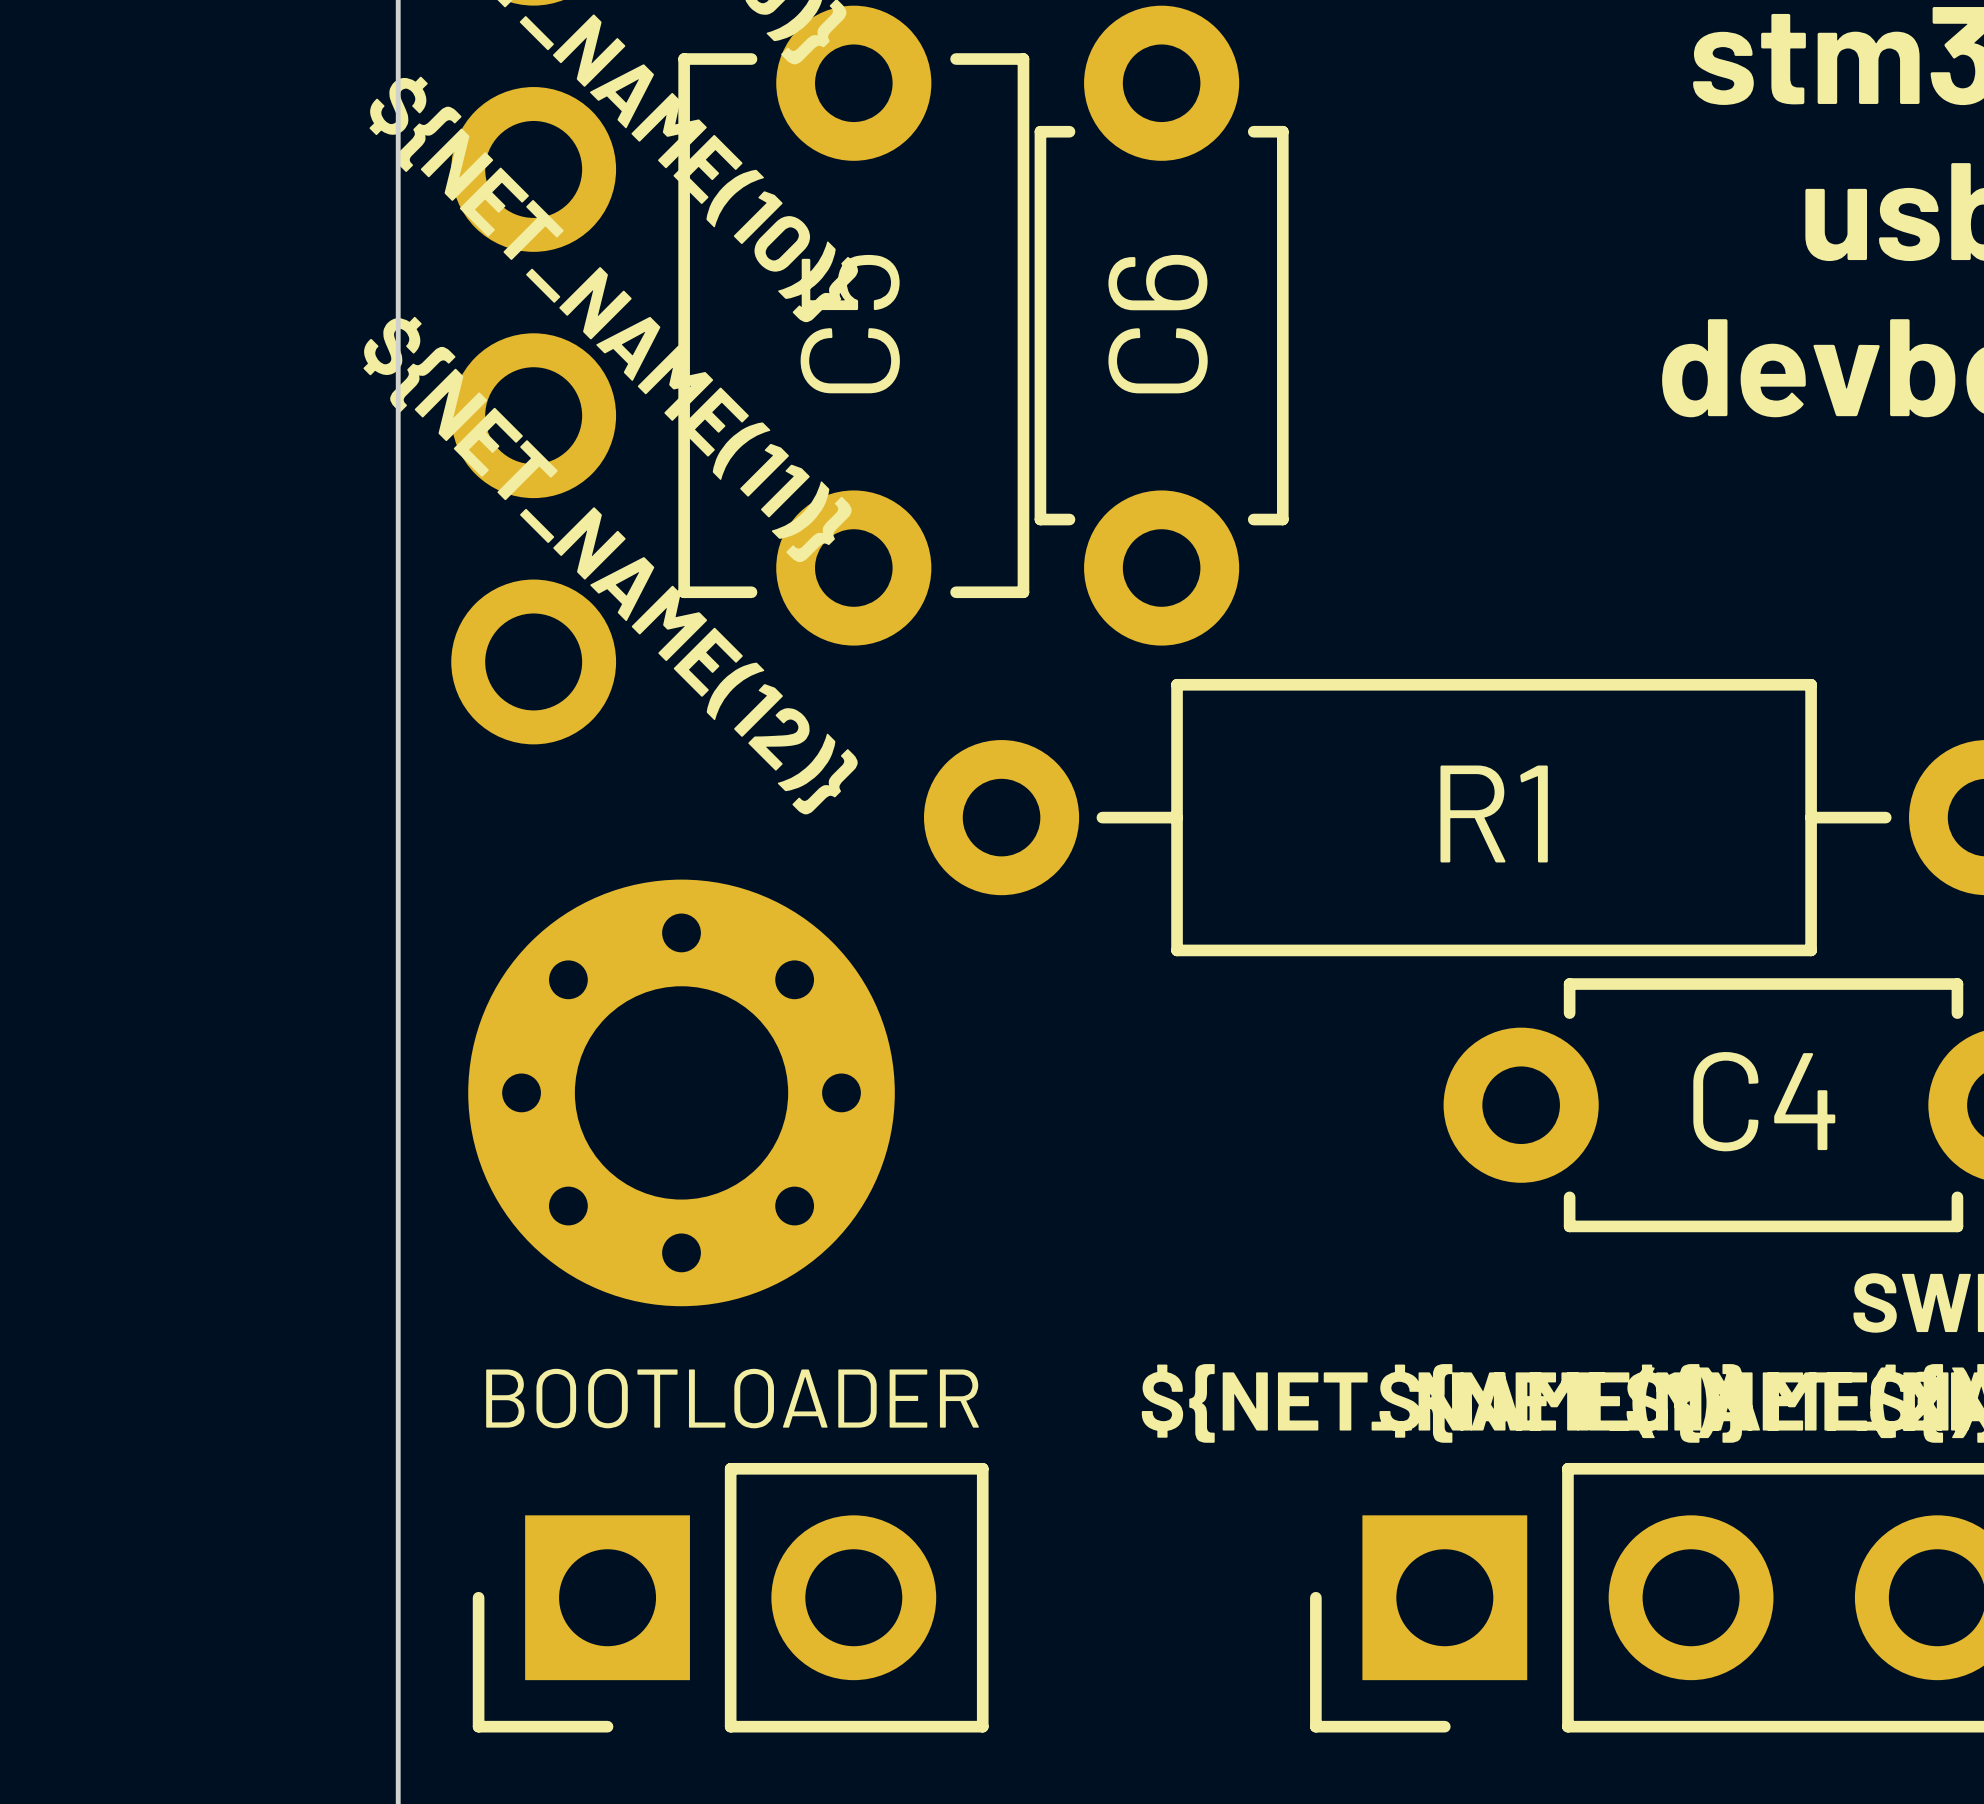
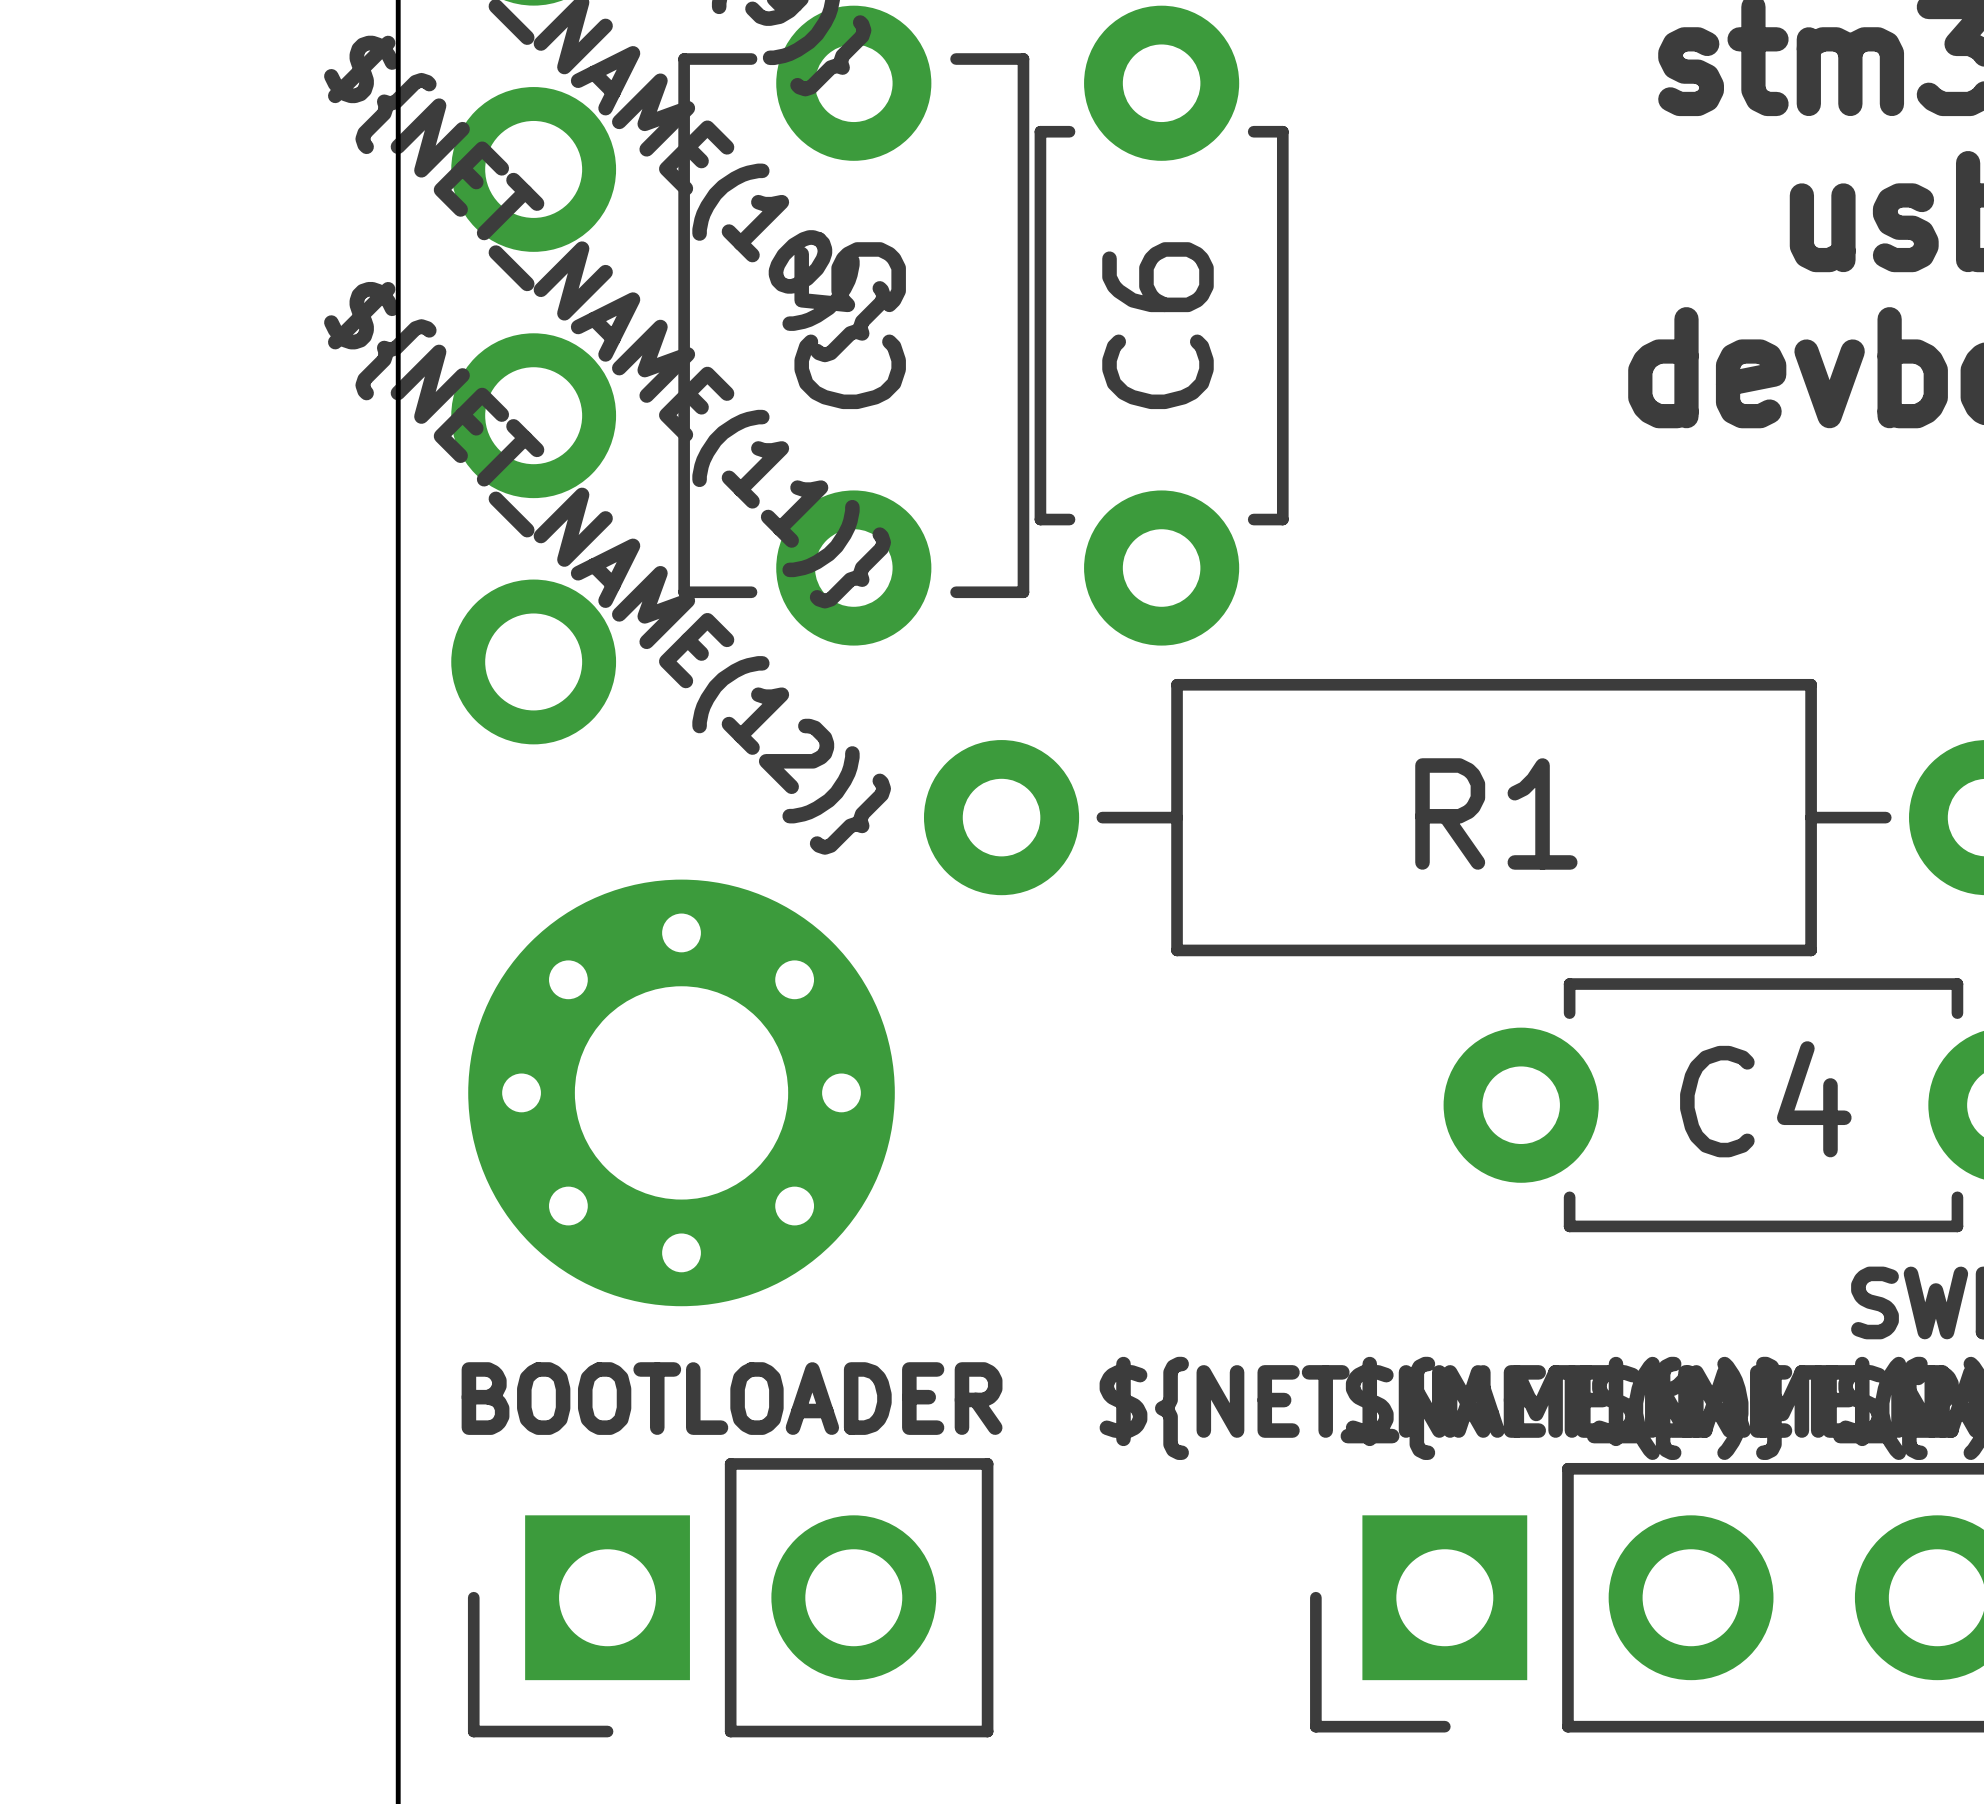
part footprint: [472, 1462, 989, 1733] -> [467, 1458, 994, 1738]

